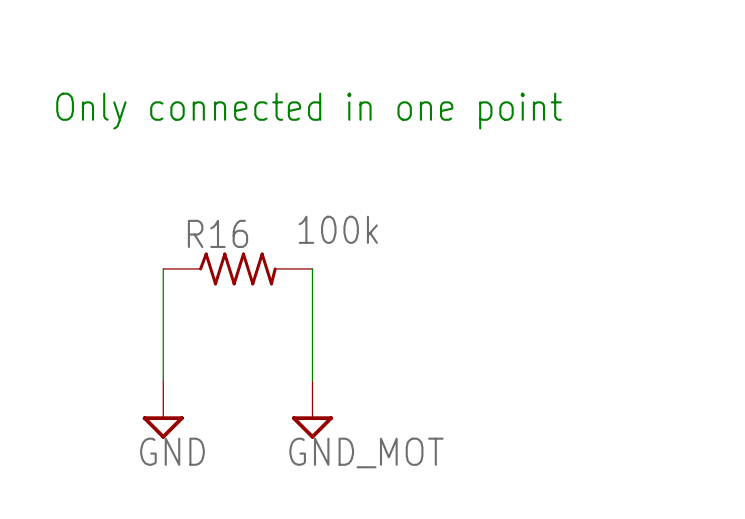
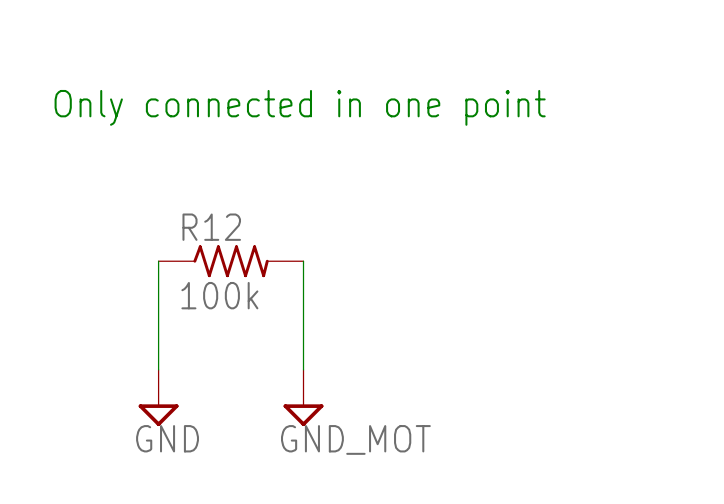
R16 value position: 100k (338, 229) -> 100k (219, 295)
R16 name: R16 (217, 233) -> R12 (211, 227)

